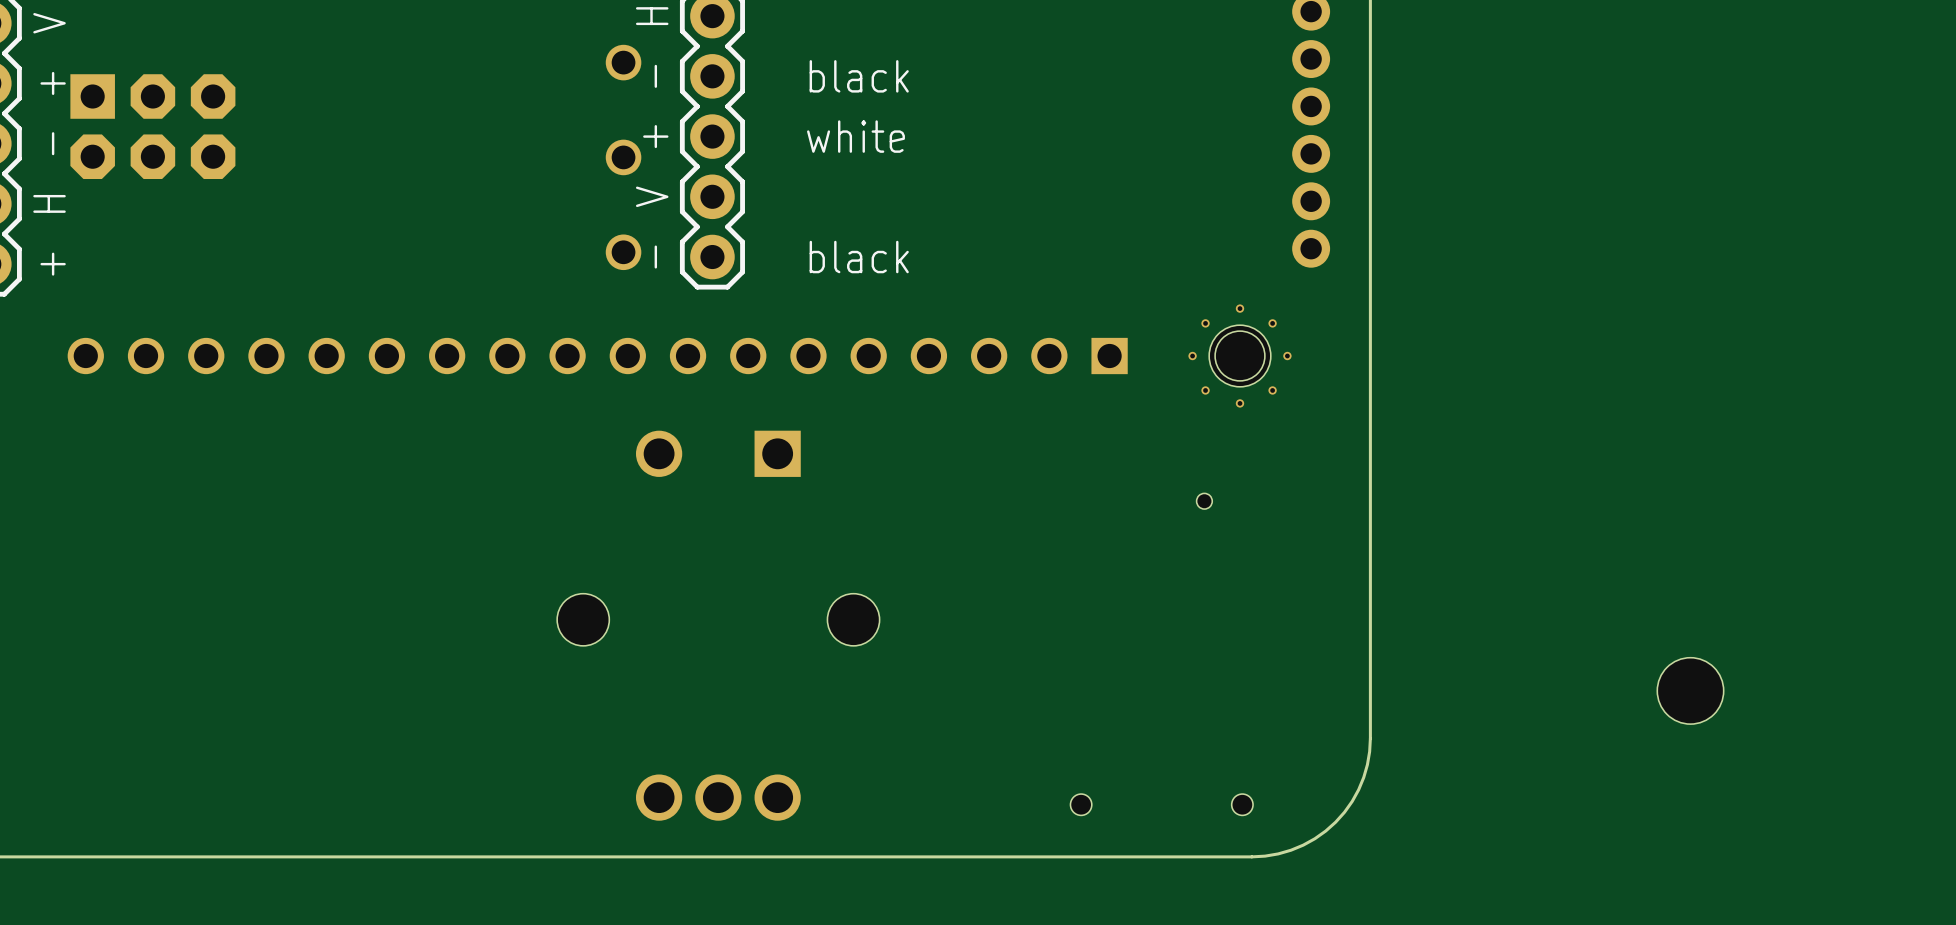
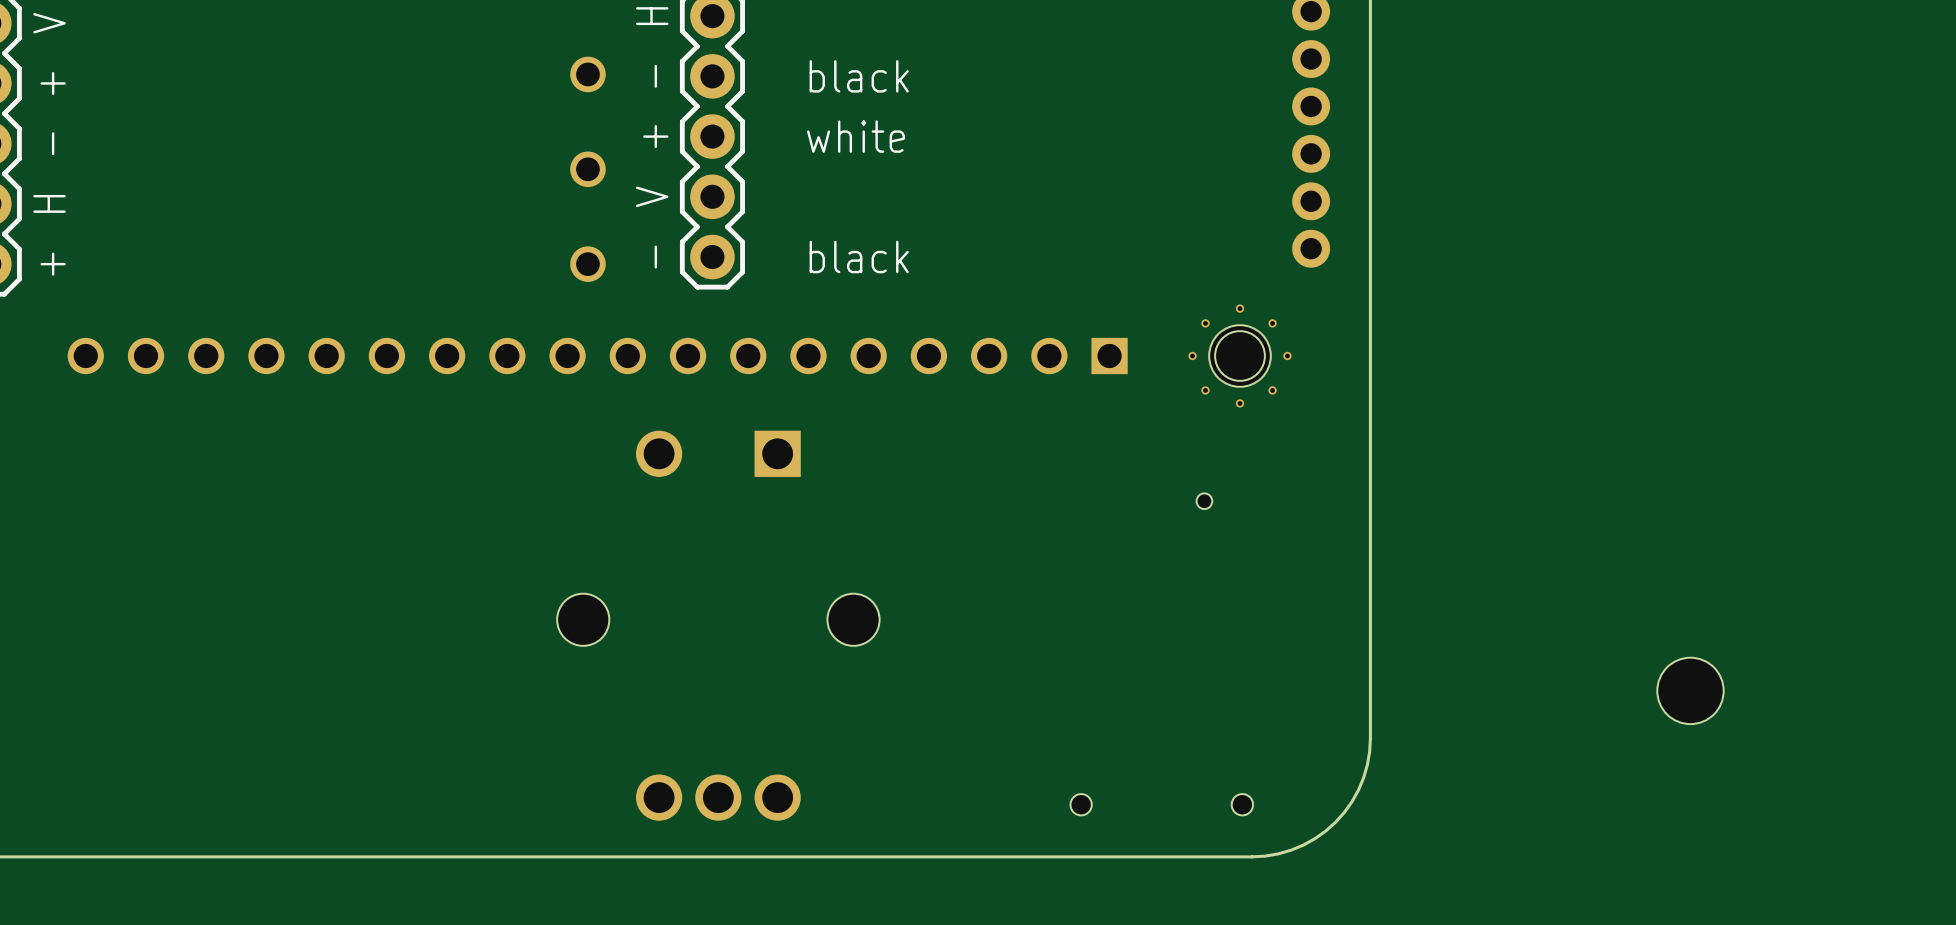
part position: (623, 62) -> (587, 74)
part: (152, 126) -> none
part position: (623, 157) -> (587, 169)
part position: (623, 252) -> (587, 264)

